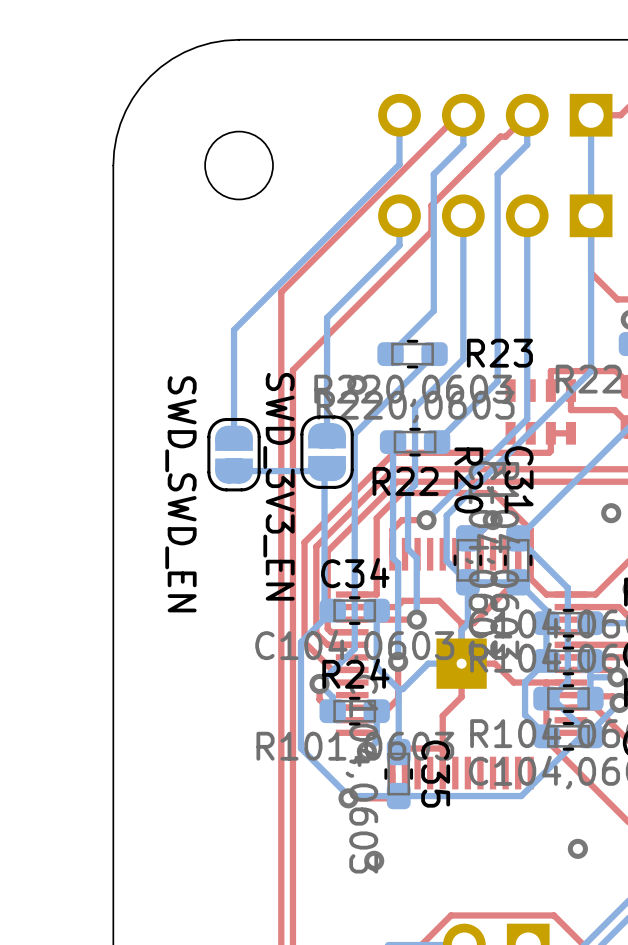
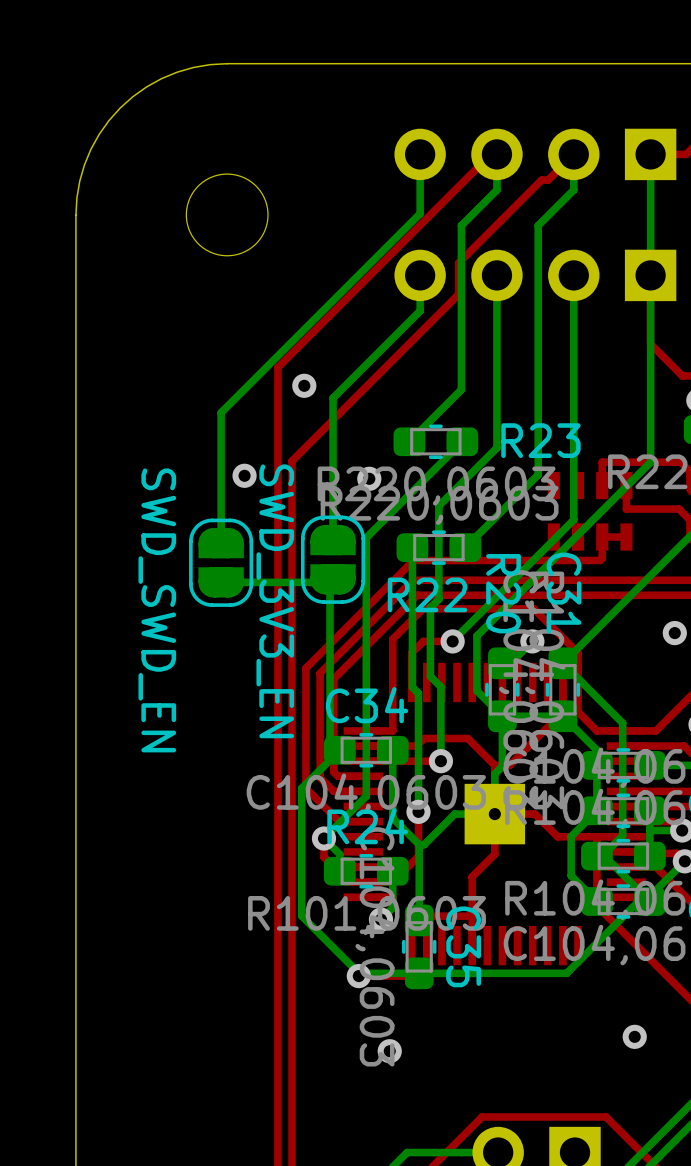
via: none -> (304, 385)
via: none -> (244, 475)

